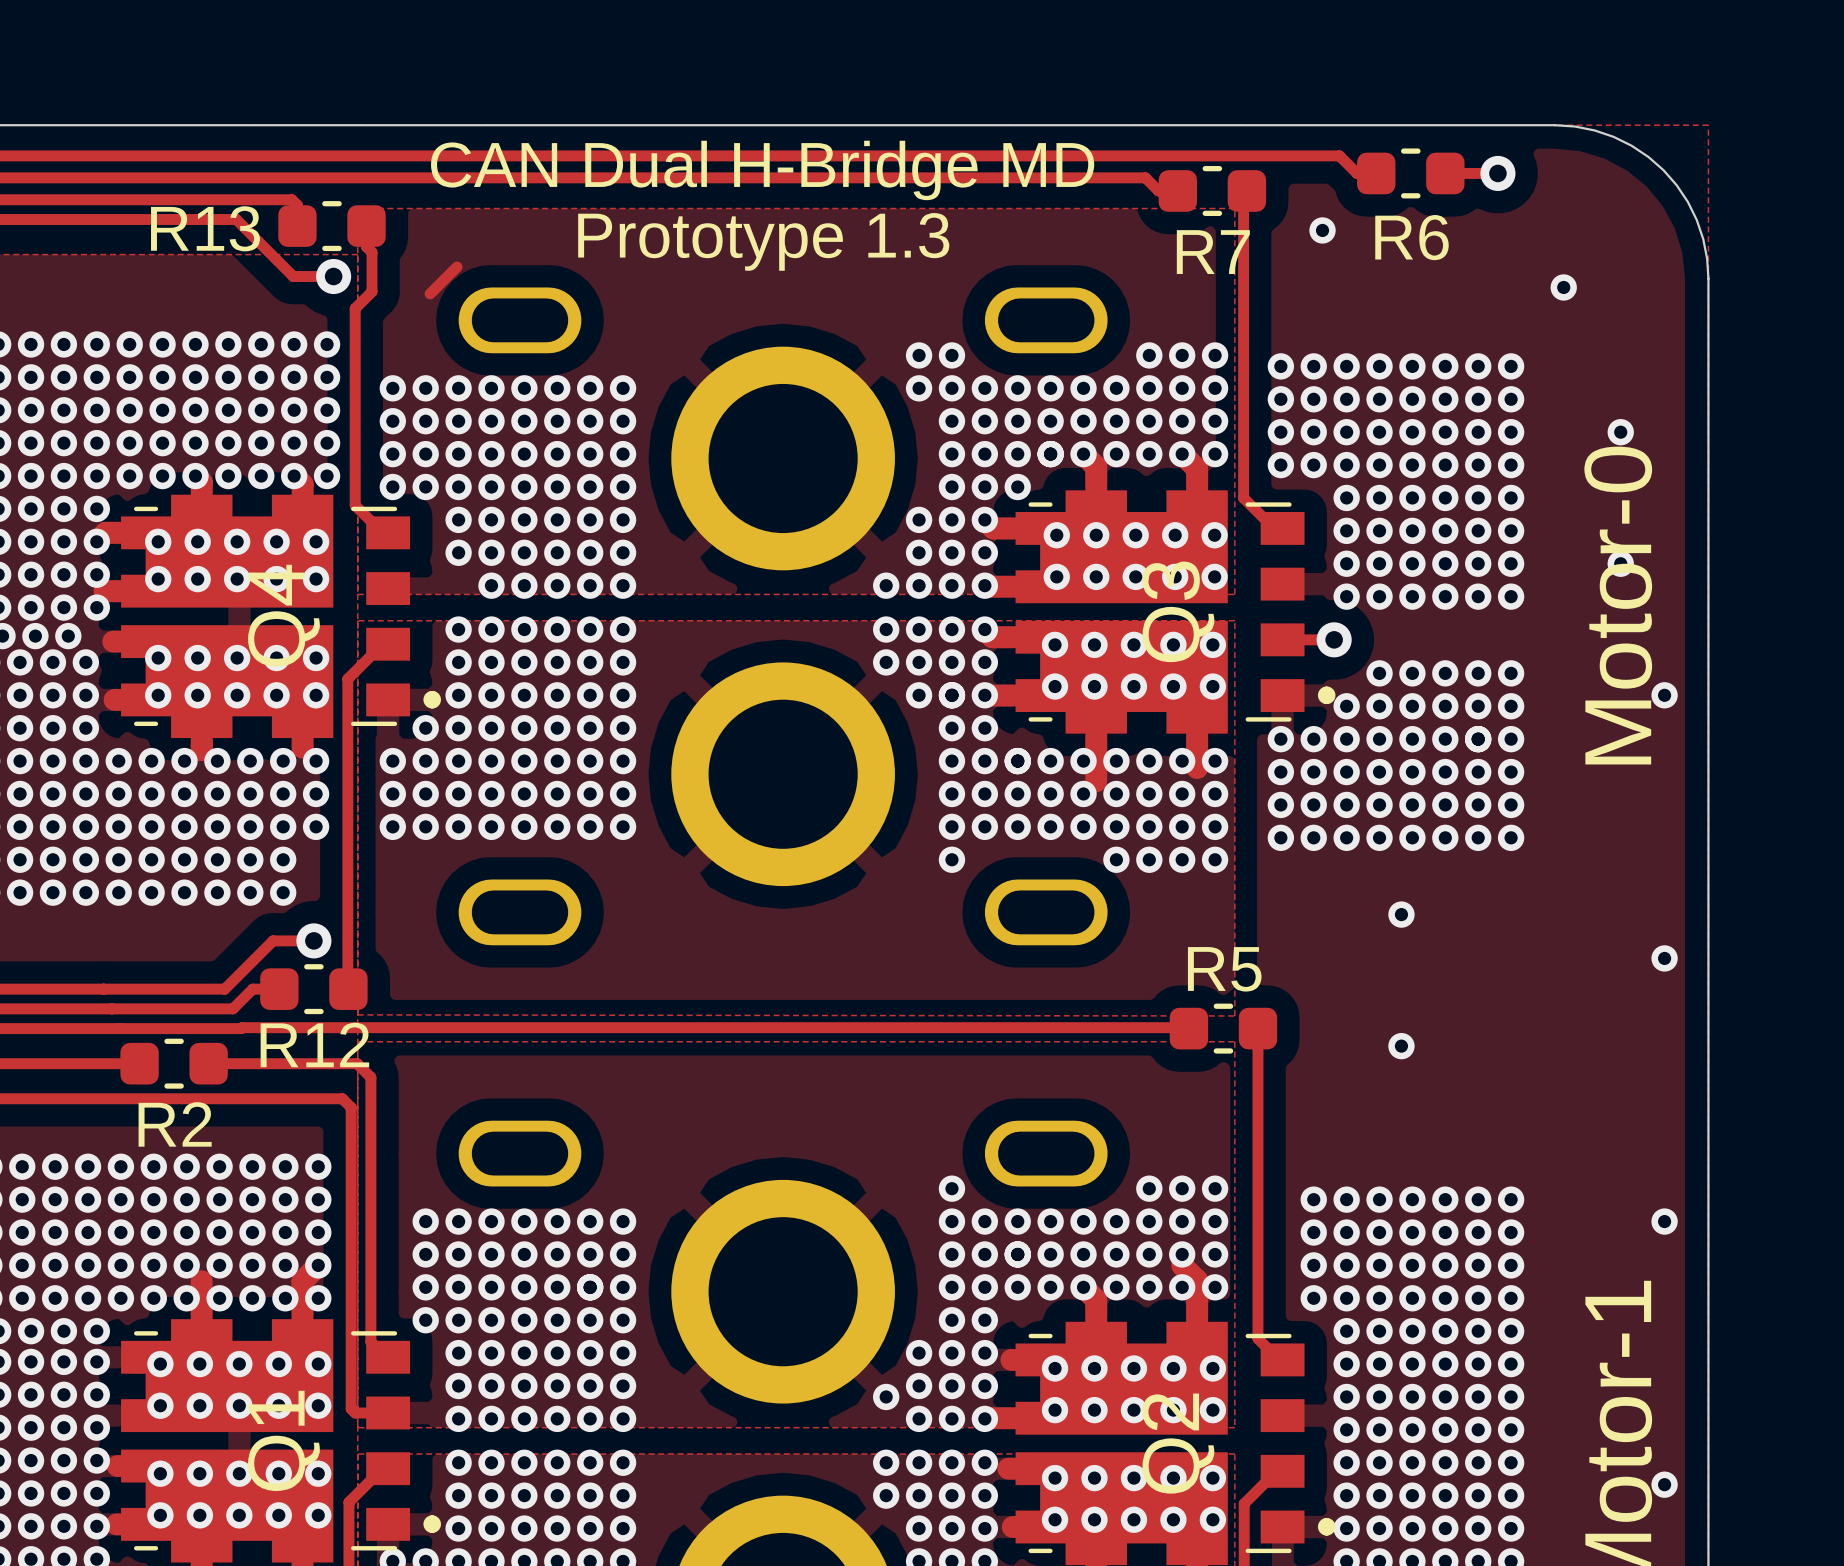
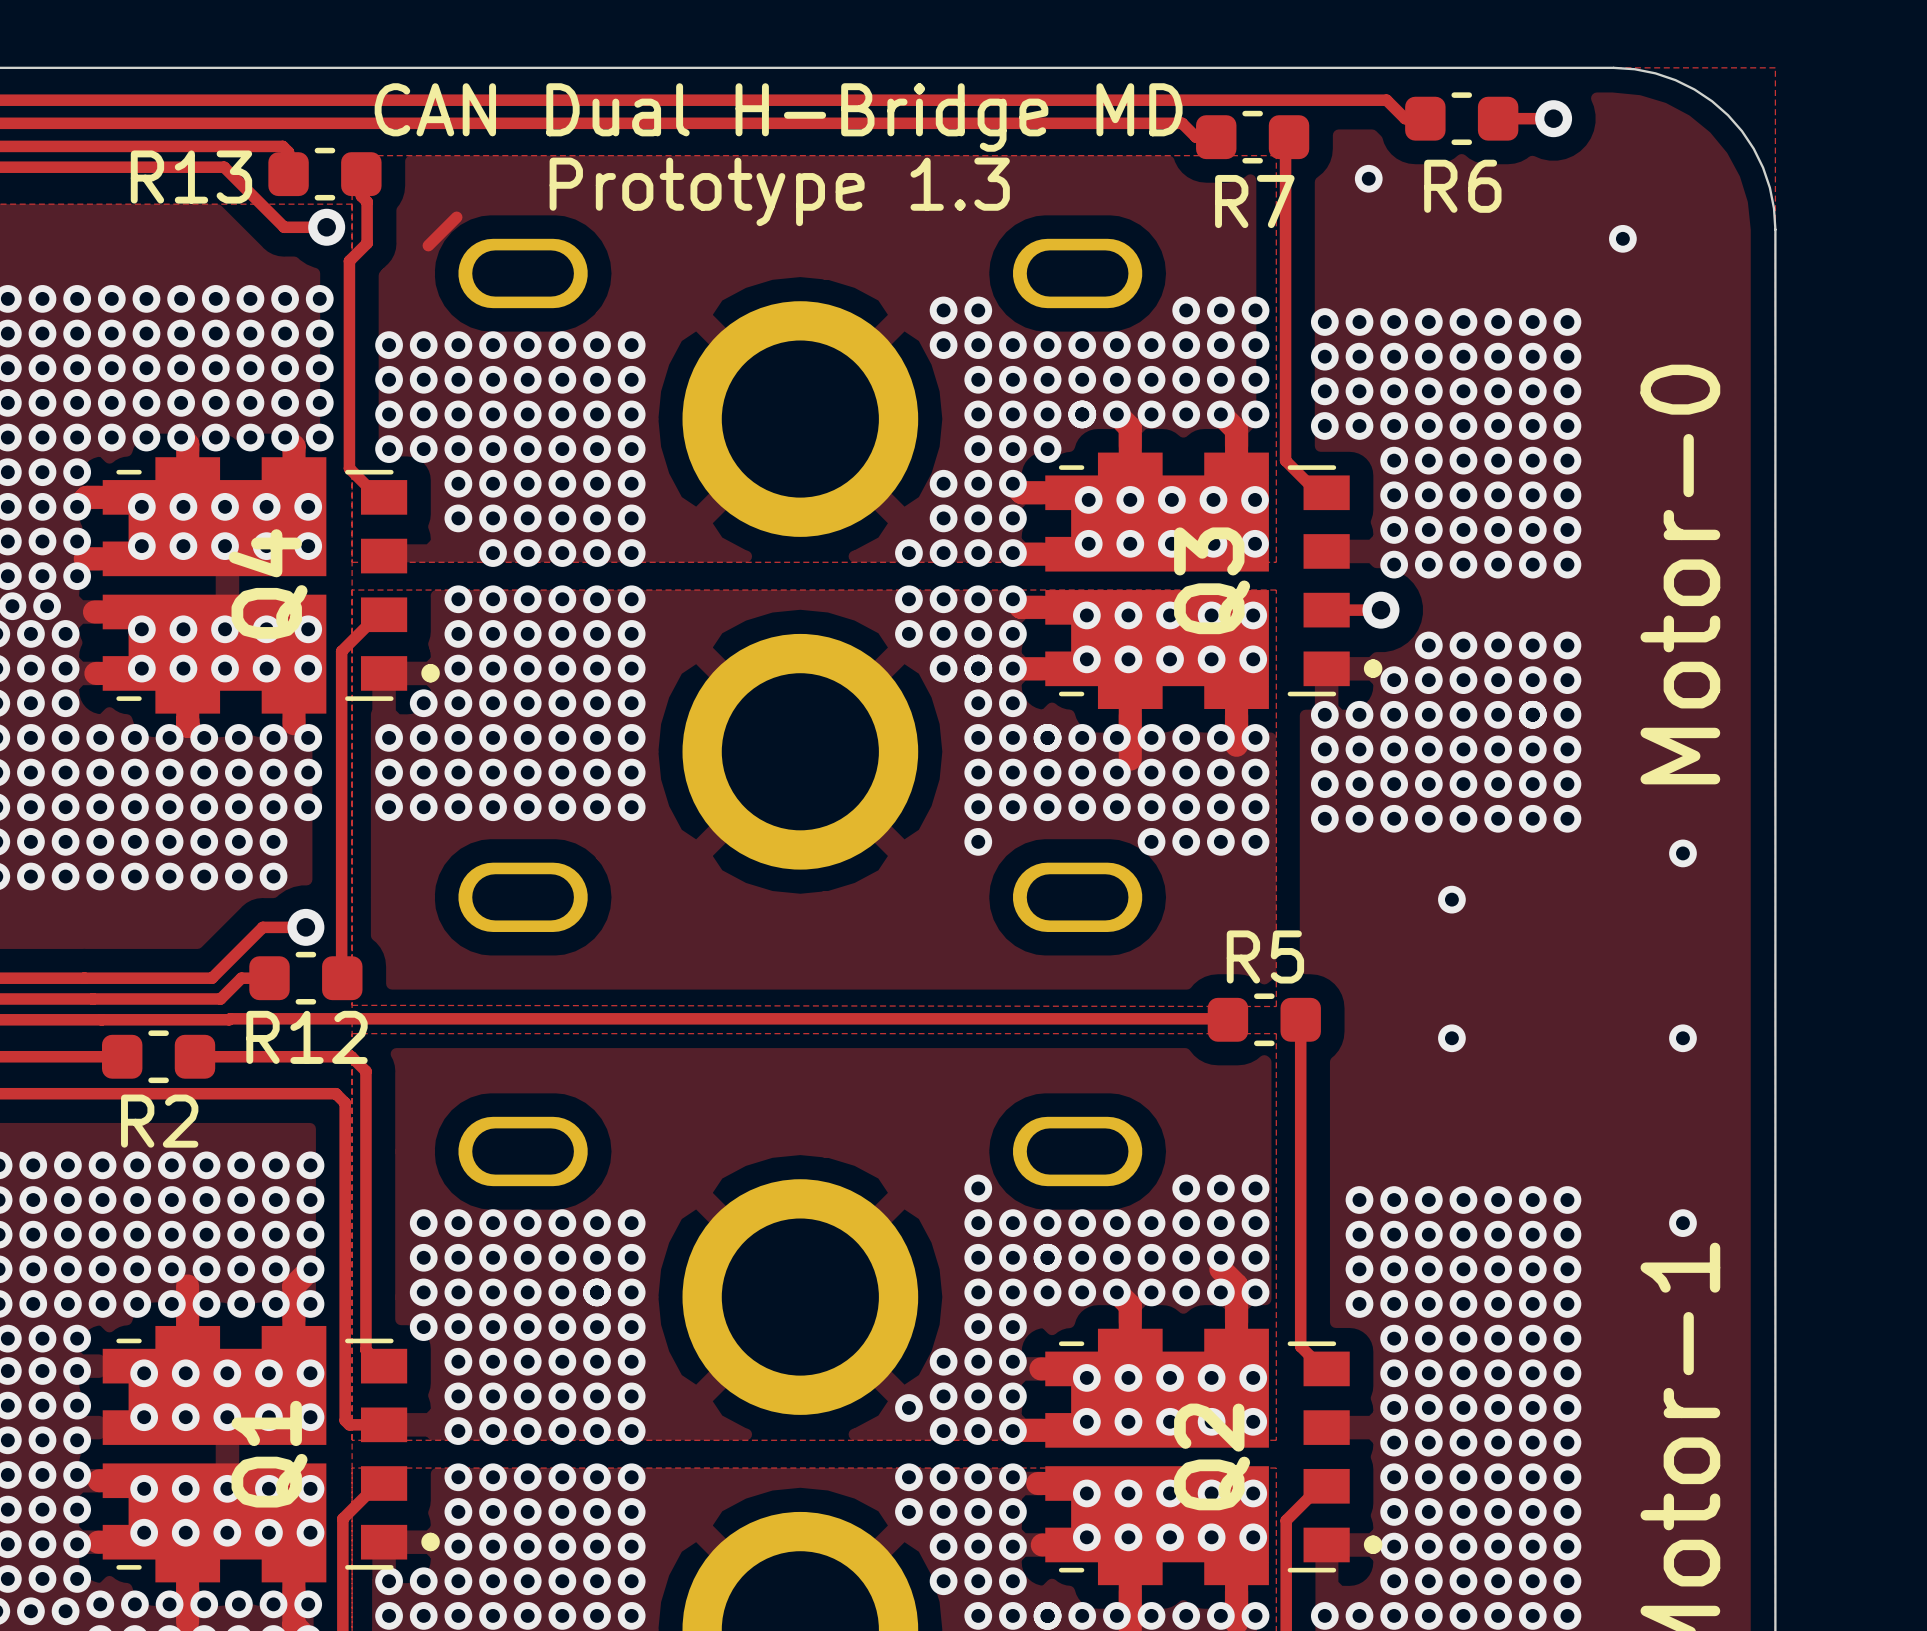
via: (1620, 432) -> none
via: (1620, 563) -> none
via: (1664, 695) -> none
via: none -> (1682, 853)
via: (1664, 958) -> none
via: none -> (1682, 1038)
via position: (1664, 1221) -> (1682, 1223)
via: (1664, 1484) -> none

